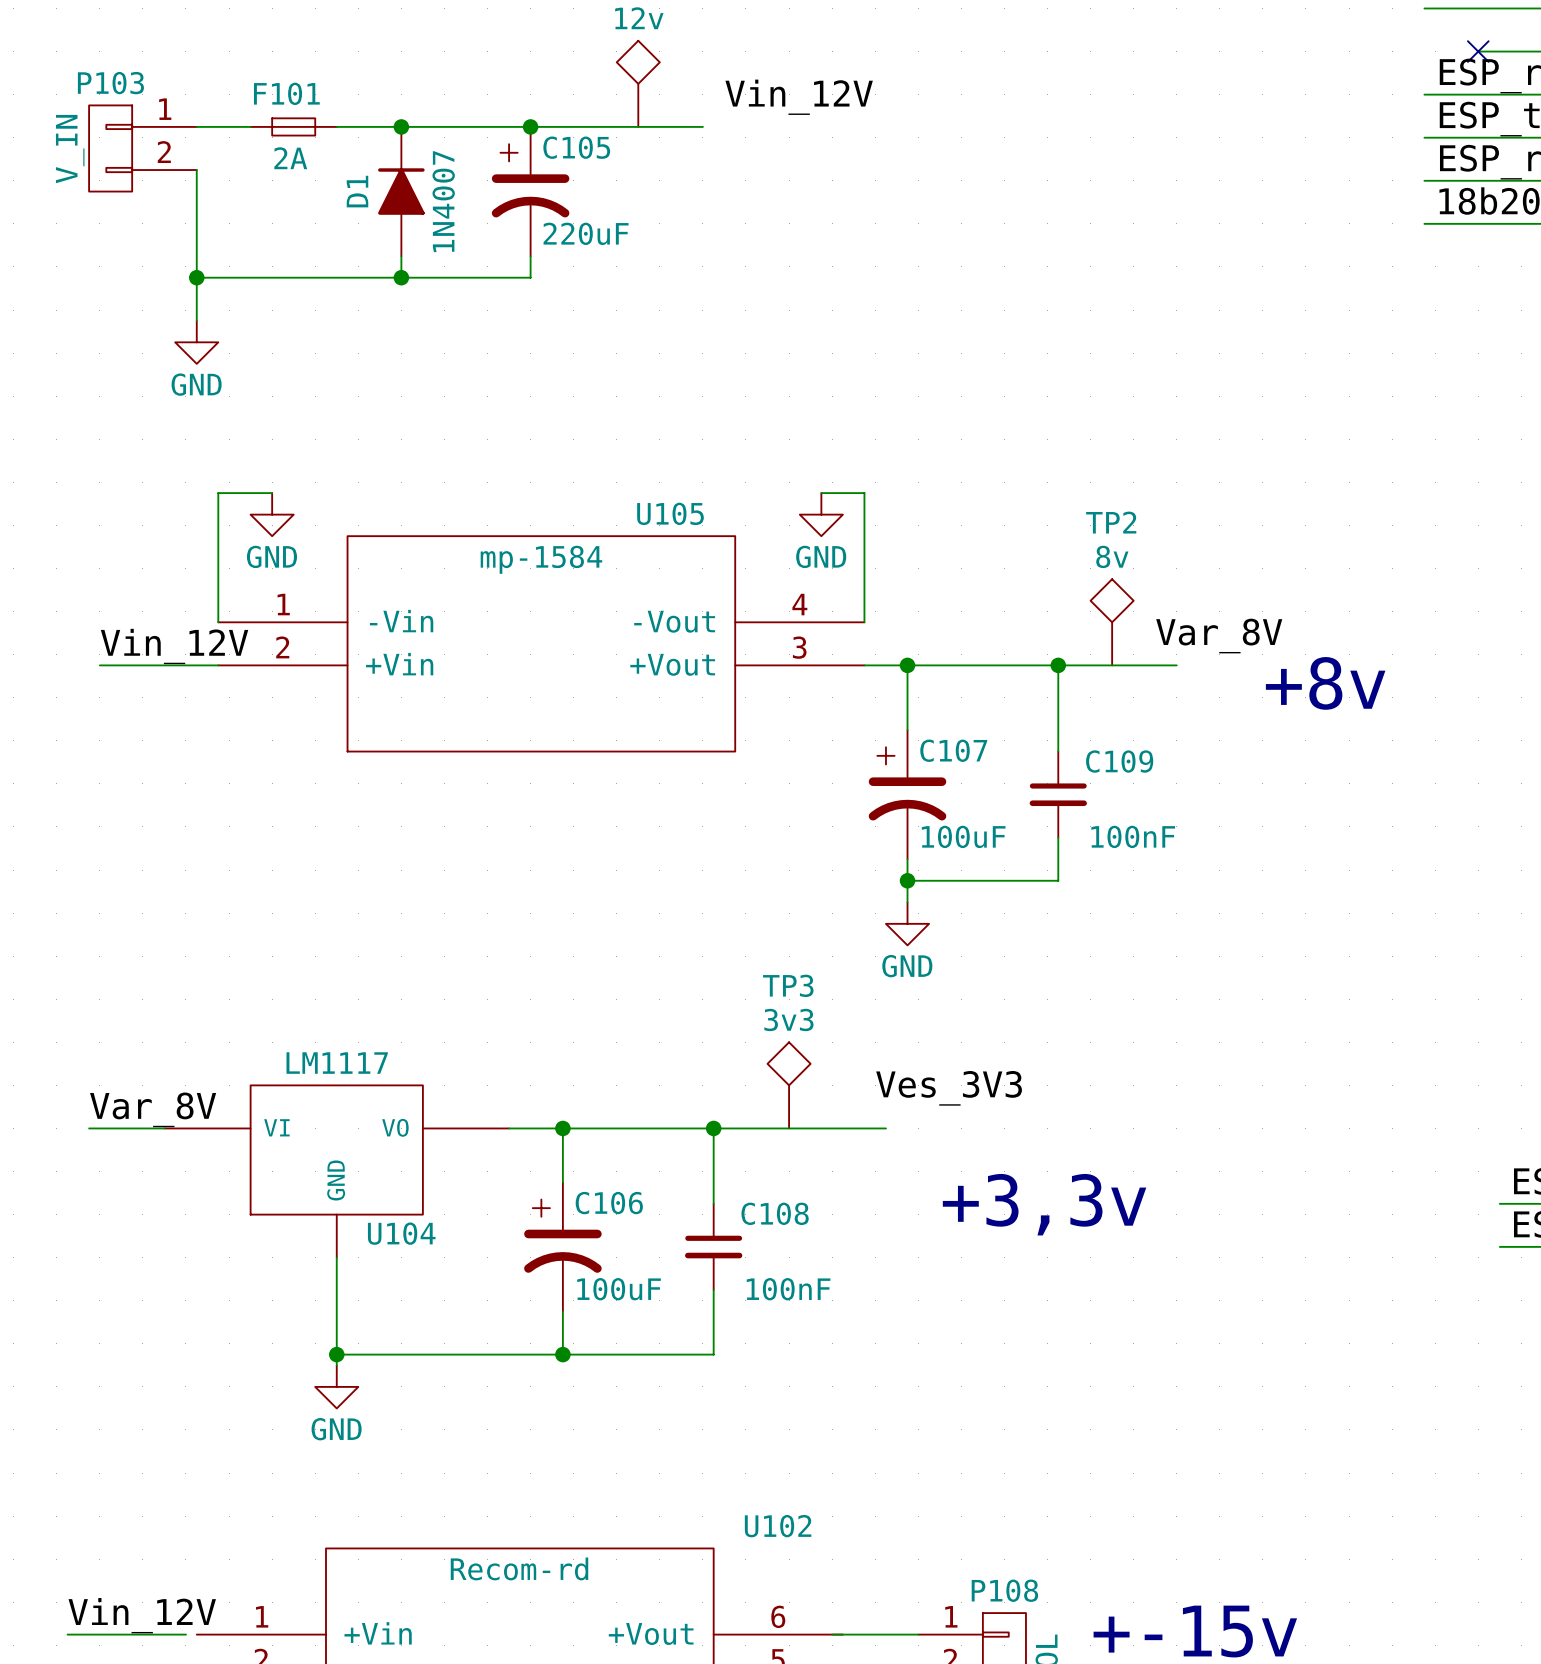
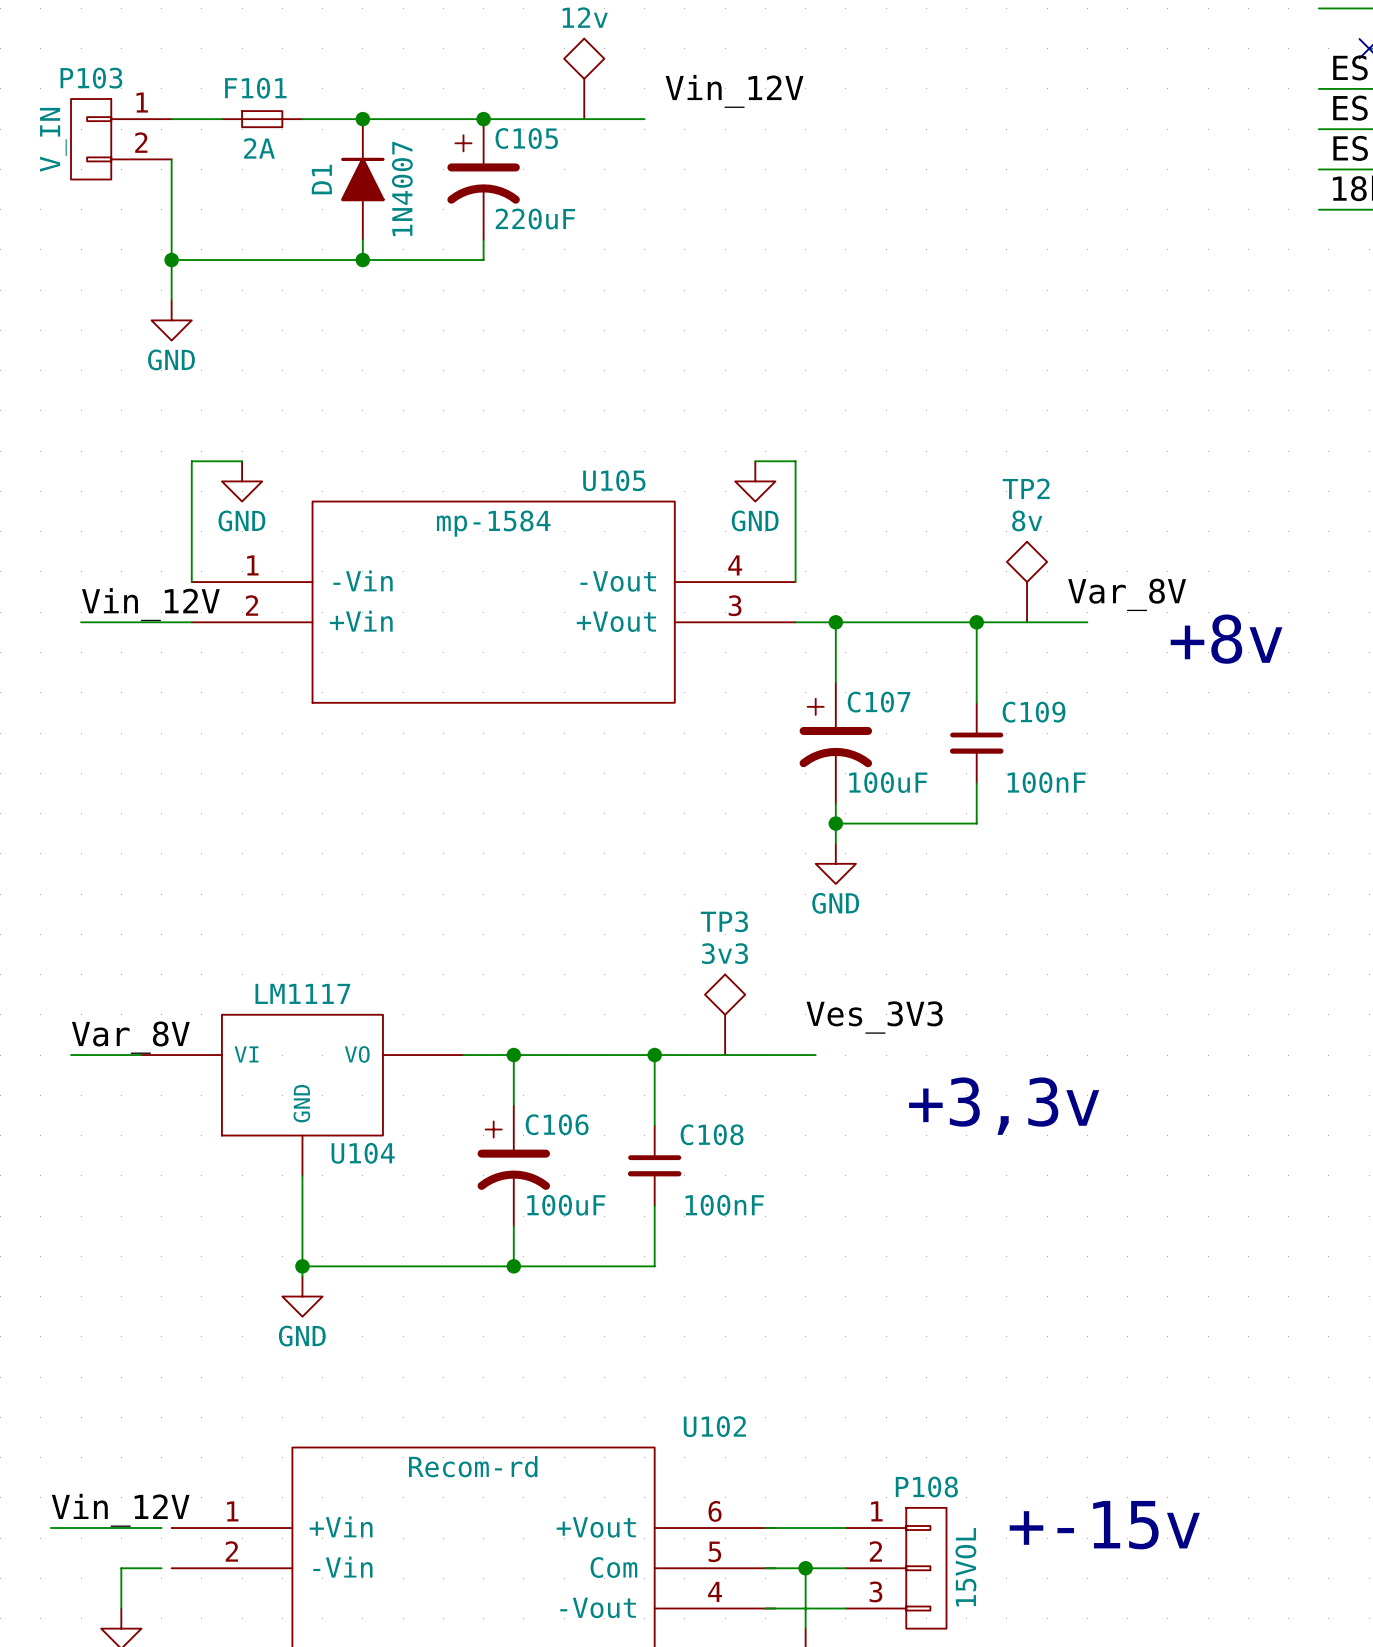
text position: +3,3v (1044, 1204) -> +3,3v (1004, 1106)

